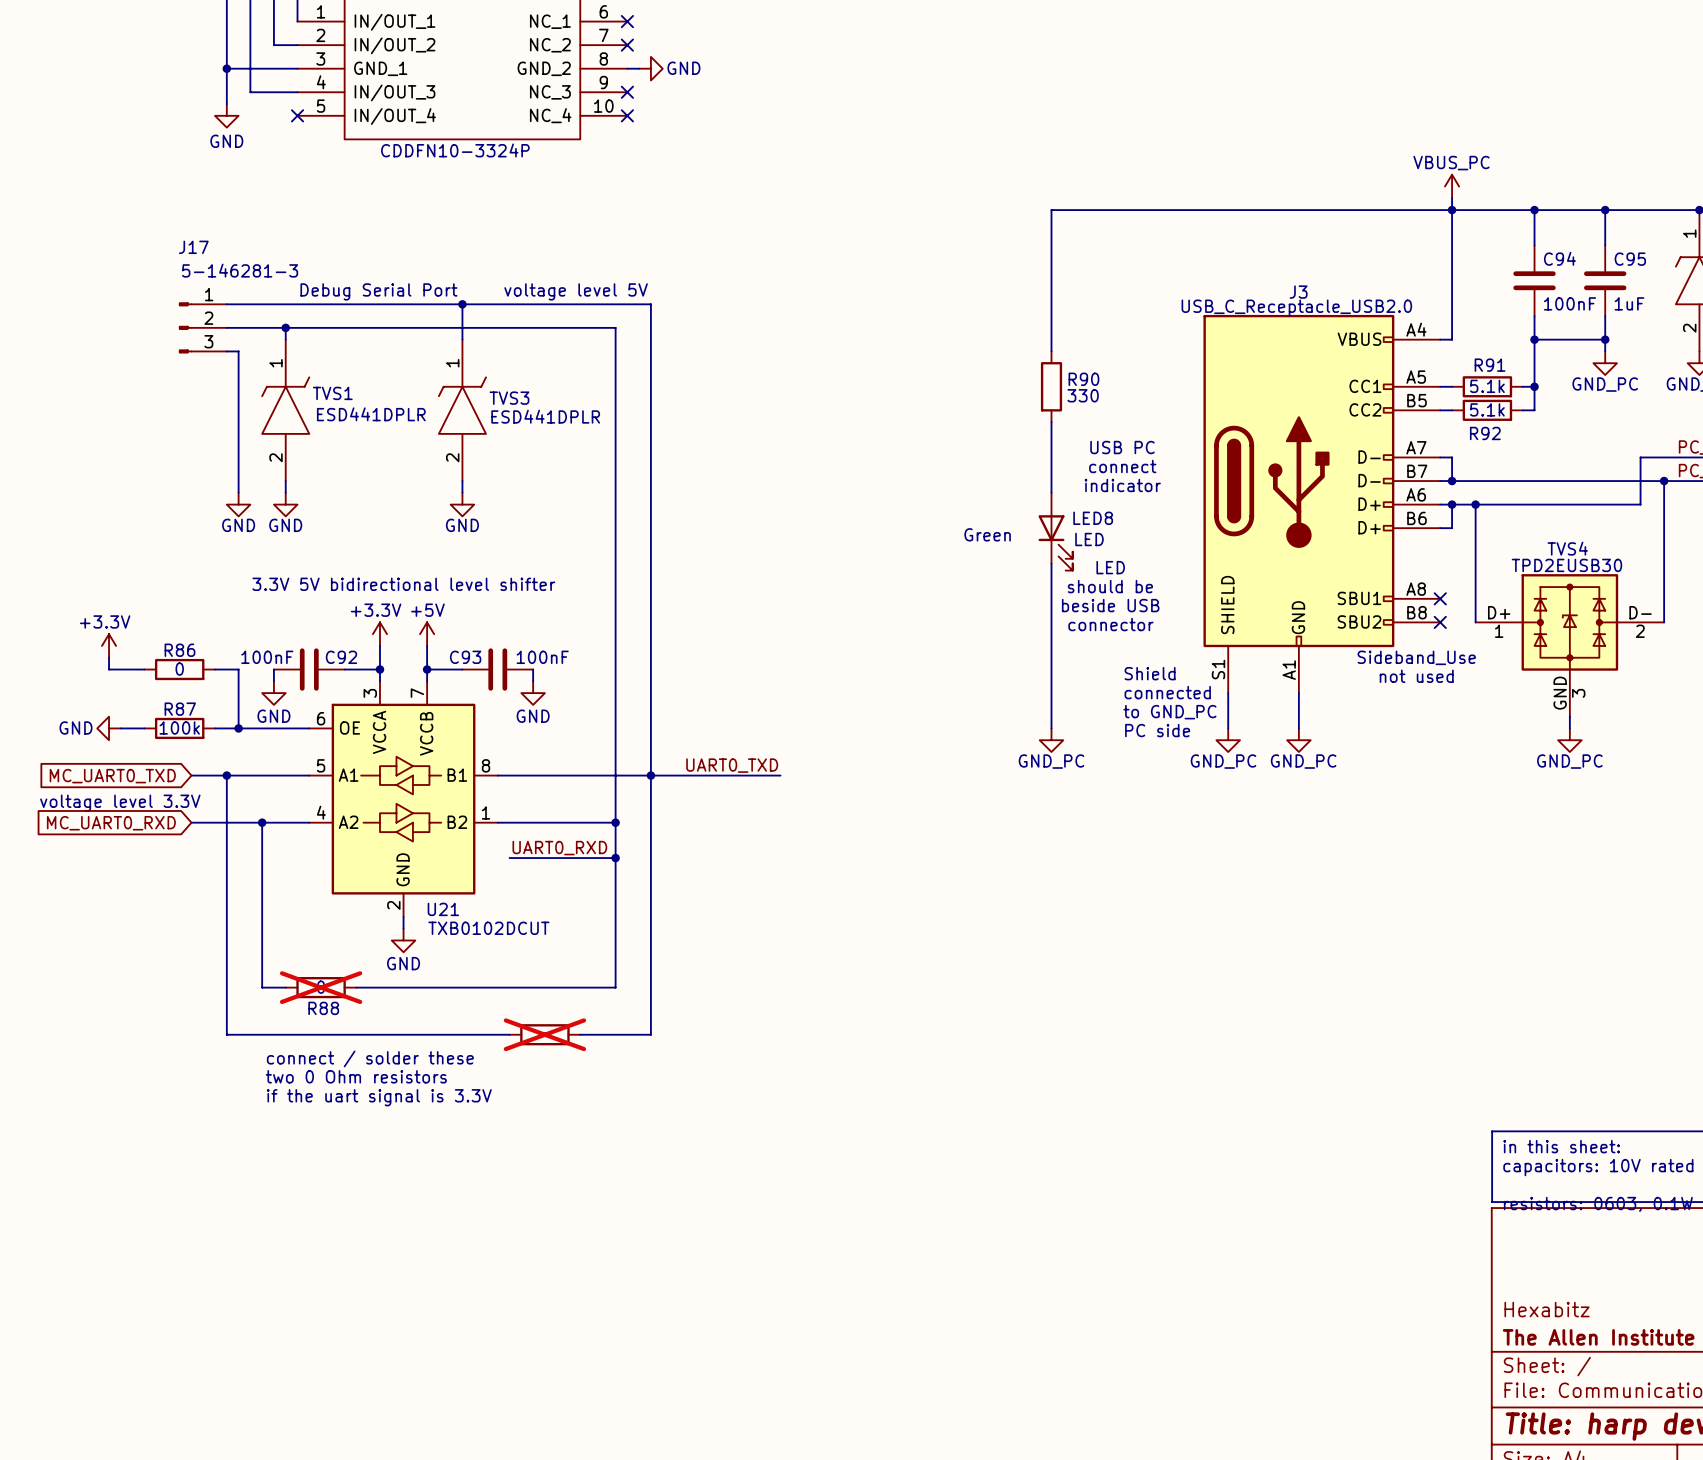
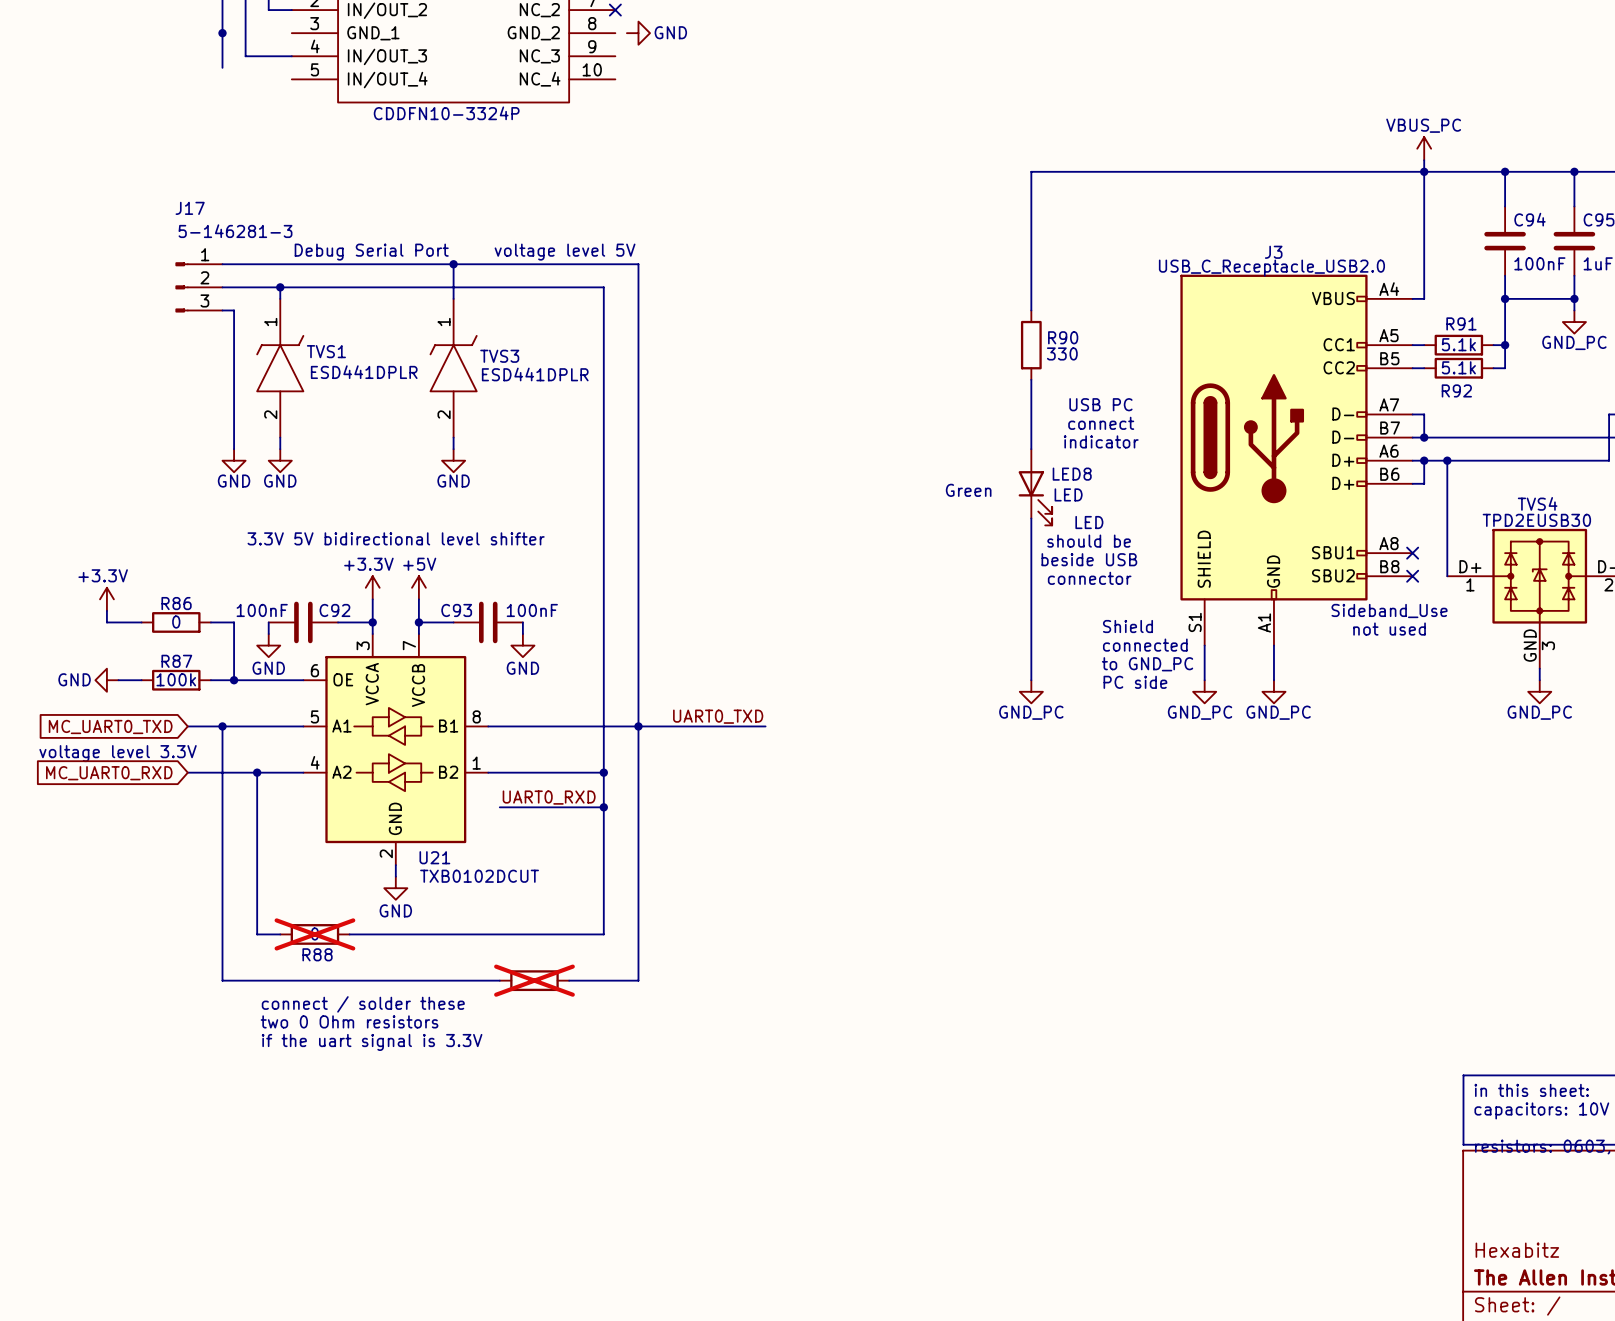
wire: (226, 68) (297, 68) -> none
wire: (627, 68) (639, 68) -> none
no-connect mark: (627, 92) -> none
power symbol: GND (226, 115) -> none
no-connect mark: (297, 115) -> none
no-connect mark: (627, 115) -> none

